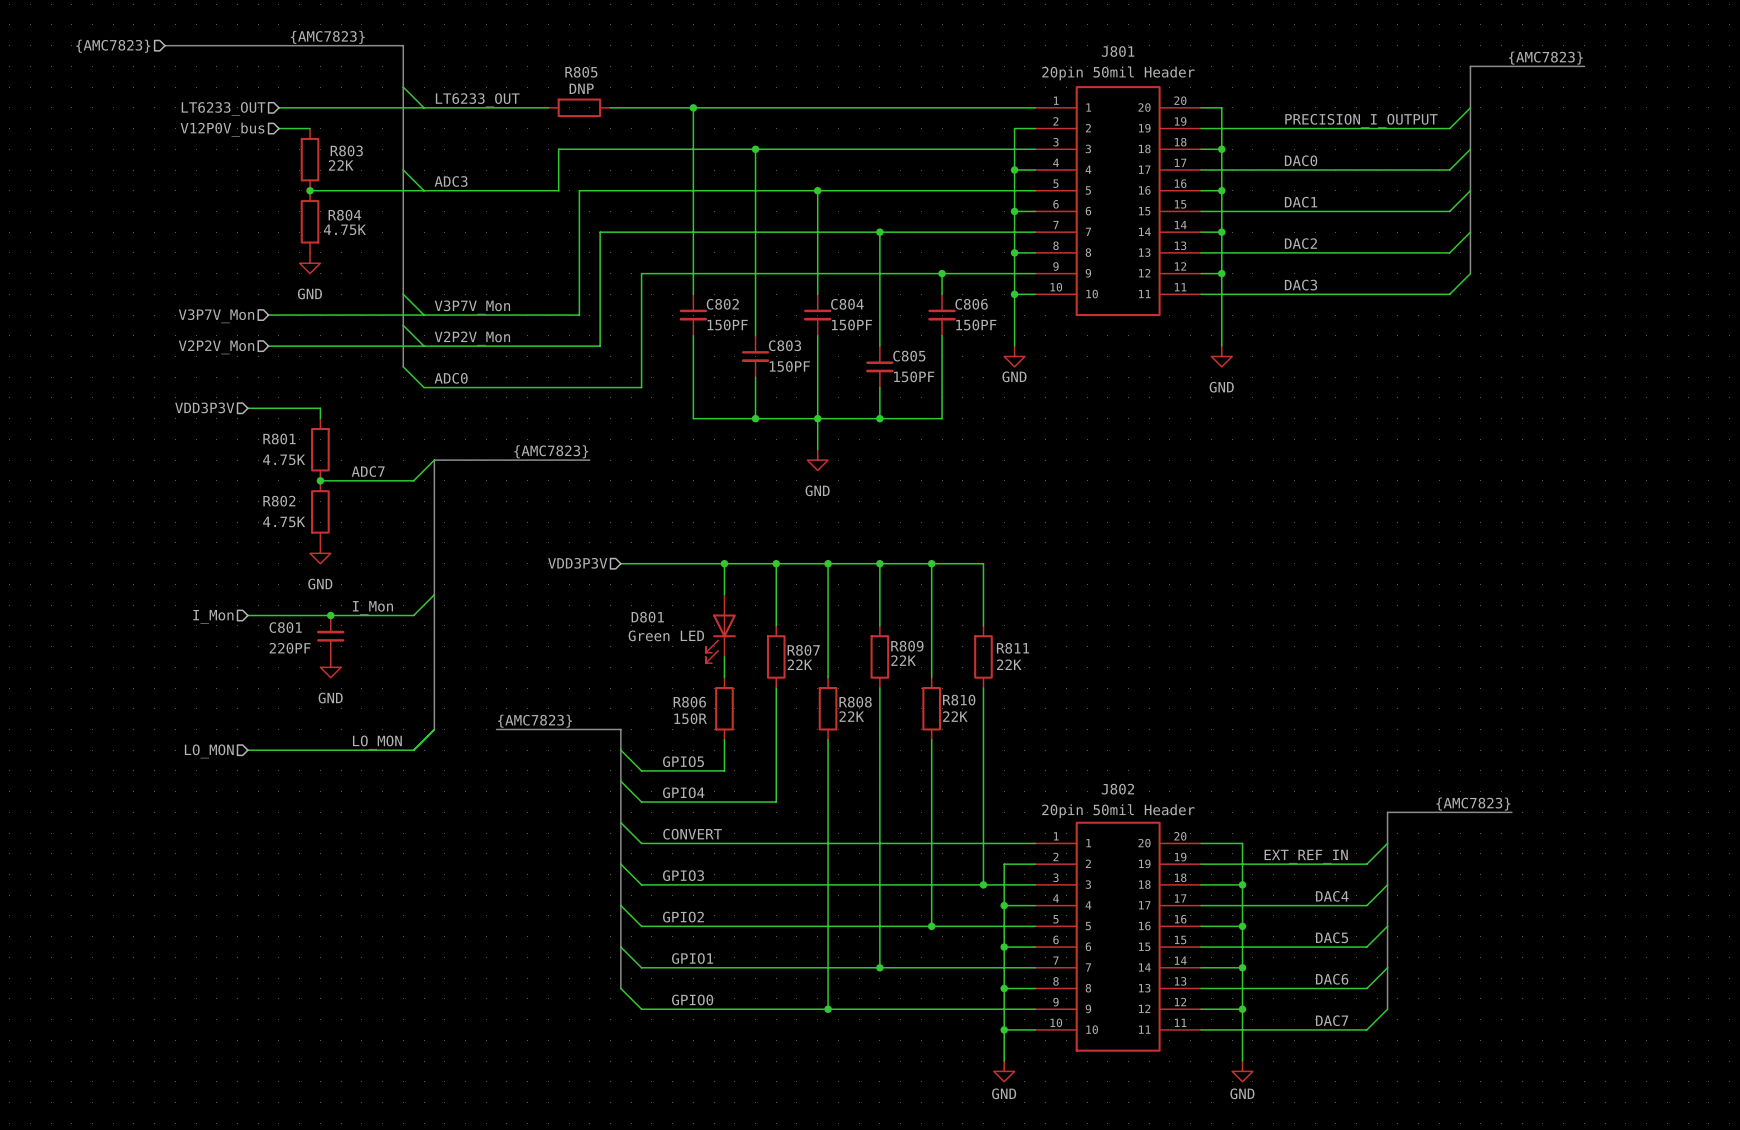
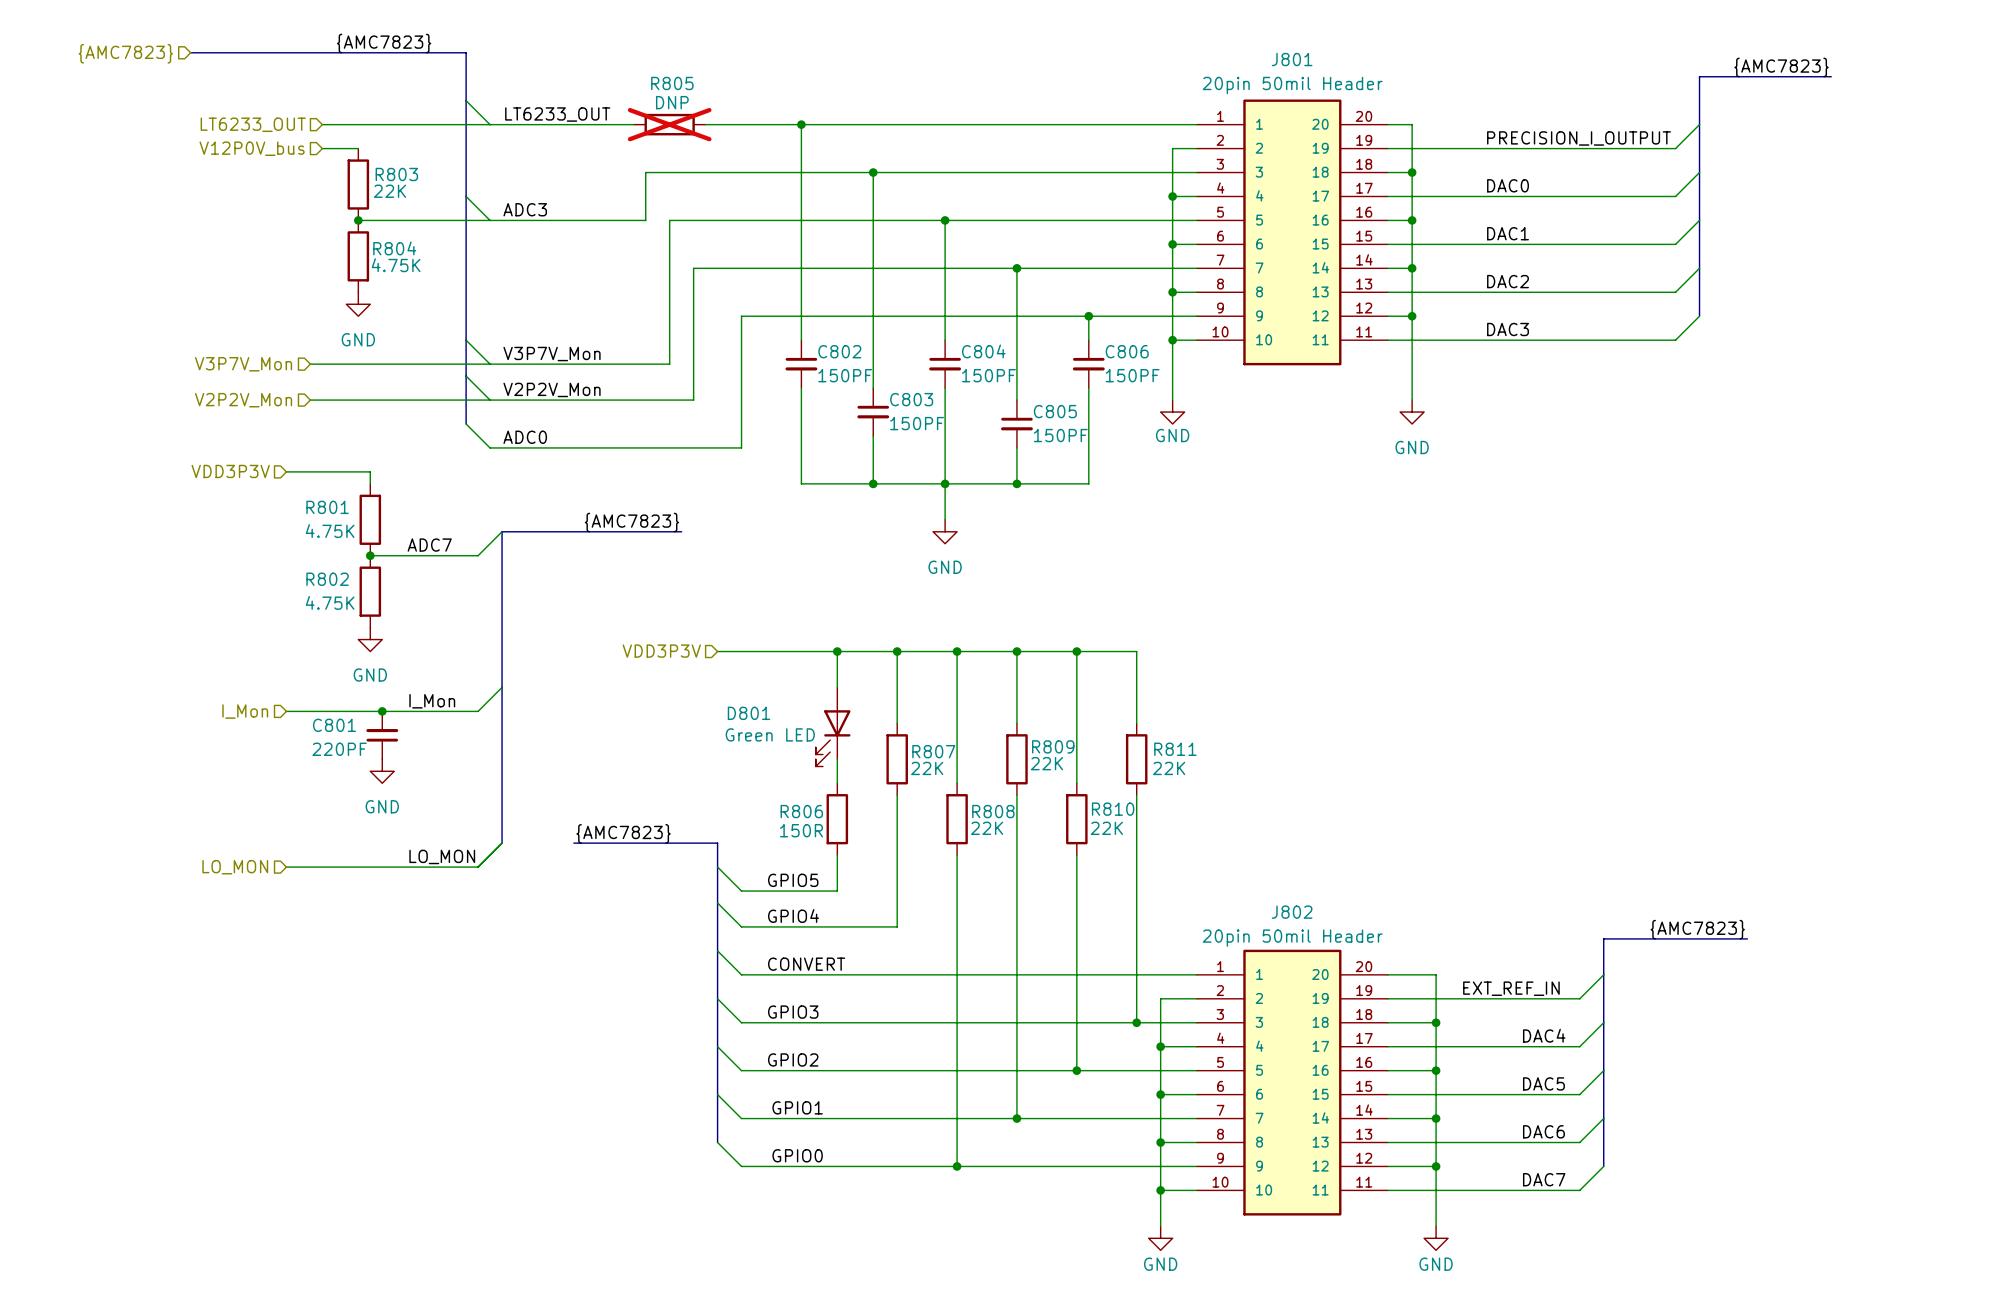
R805 do-not-place cross: none -> (669, 124)

